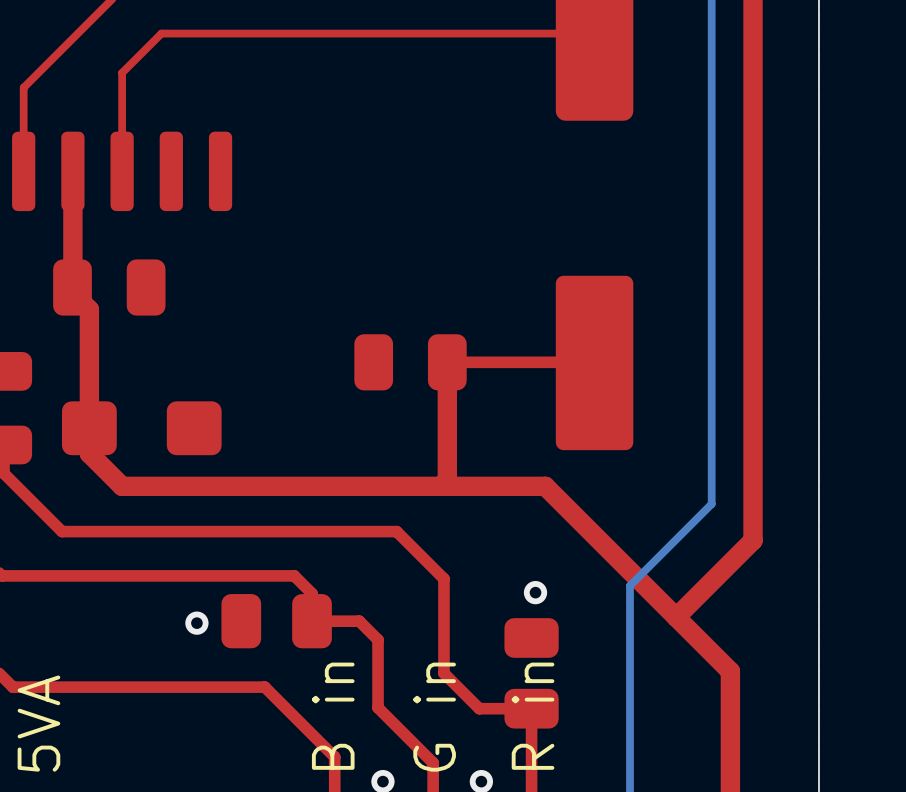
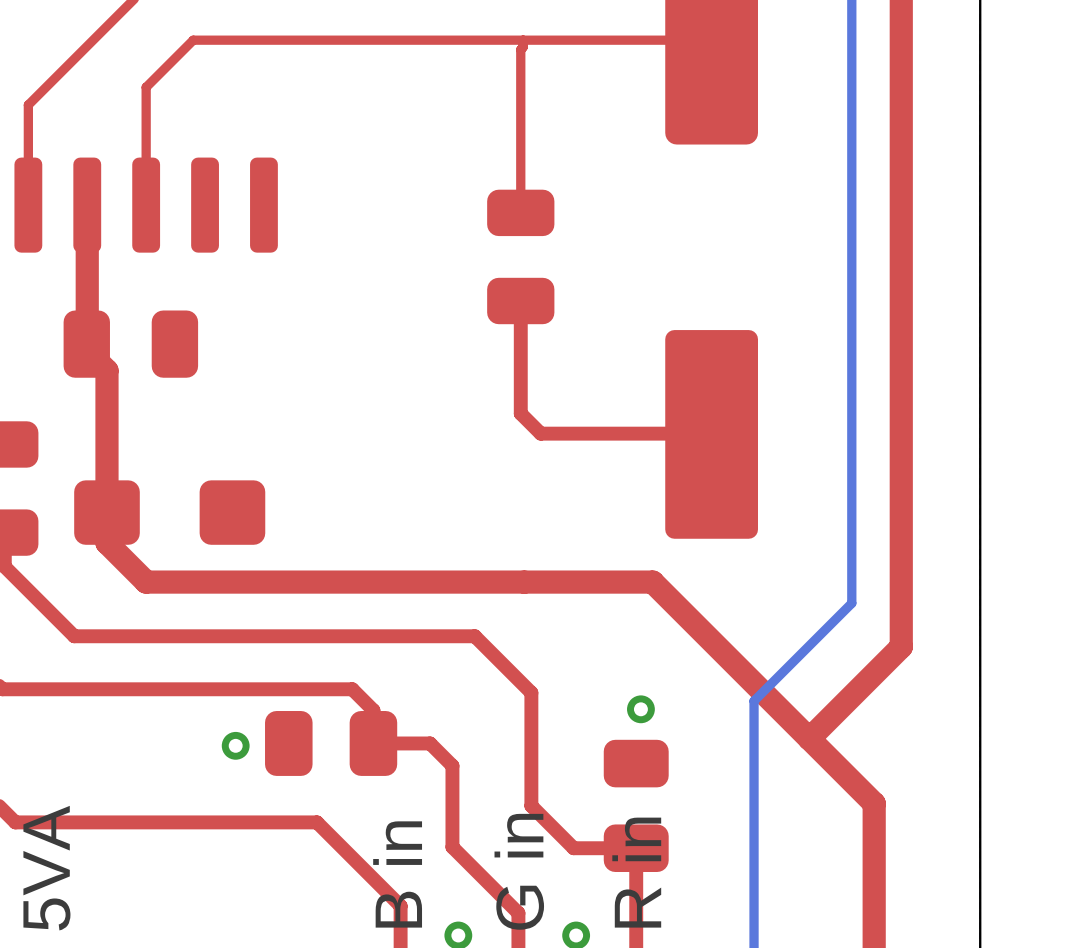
top track: none -> (523, 40) (523, 47) (520, 49) (520, 212)
part rotation: 0° (410, 362) -> 90° clockwise (520, 256)
part position: (410, 362) -> (520, 256)
top track: (451, 362) (447, 362) (447, 486) -> (540, 433) (520, 413) (520, 301)

